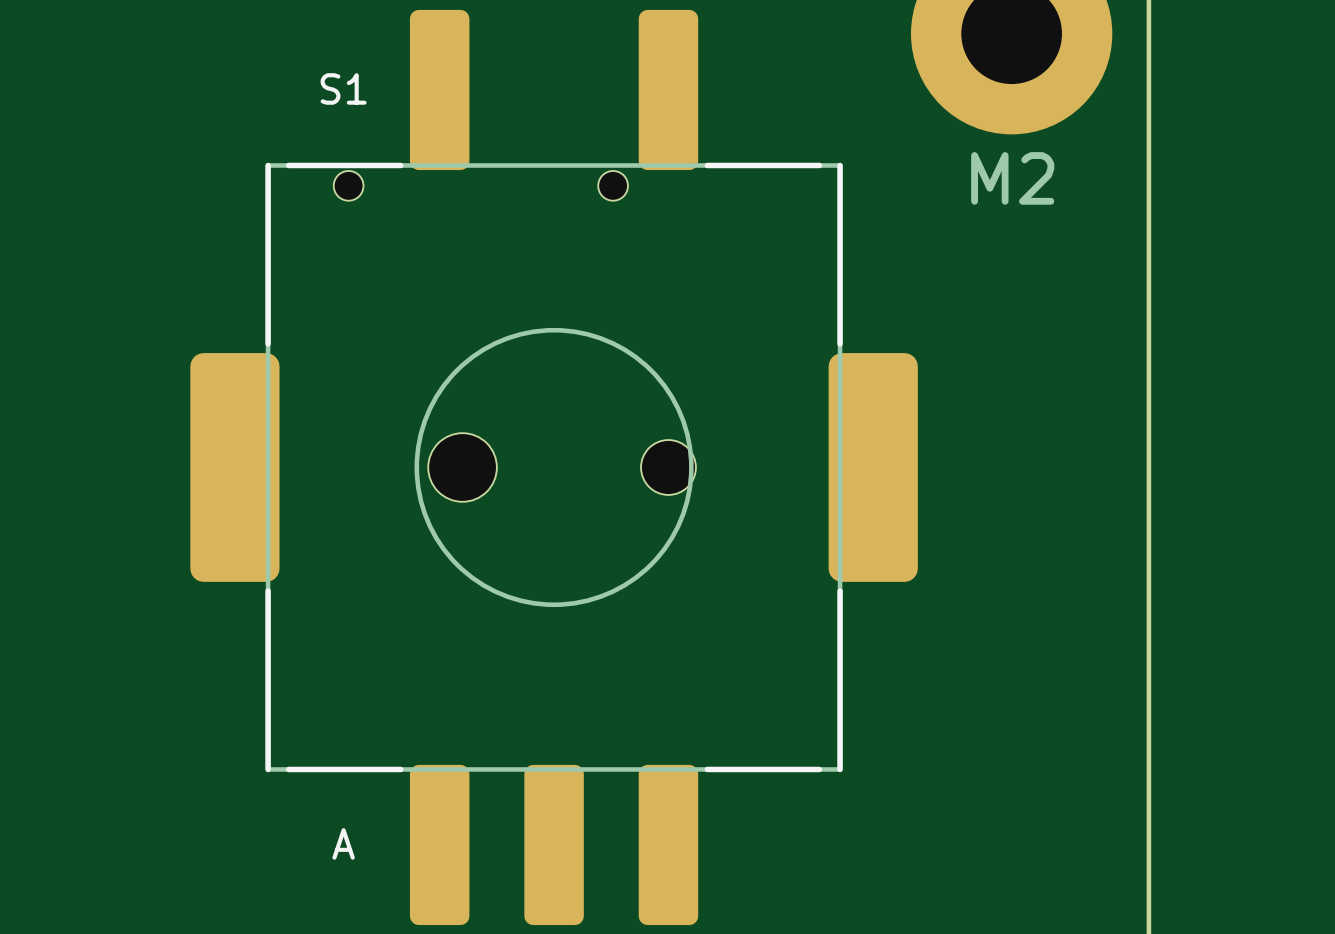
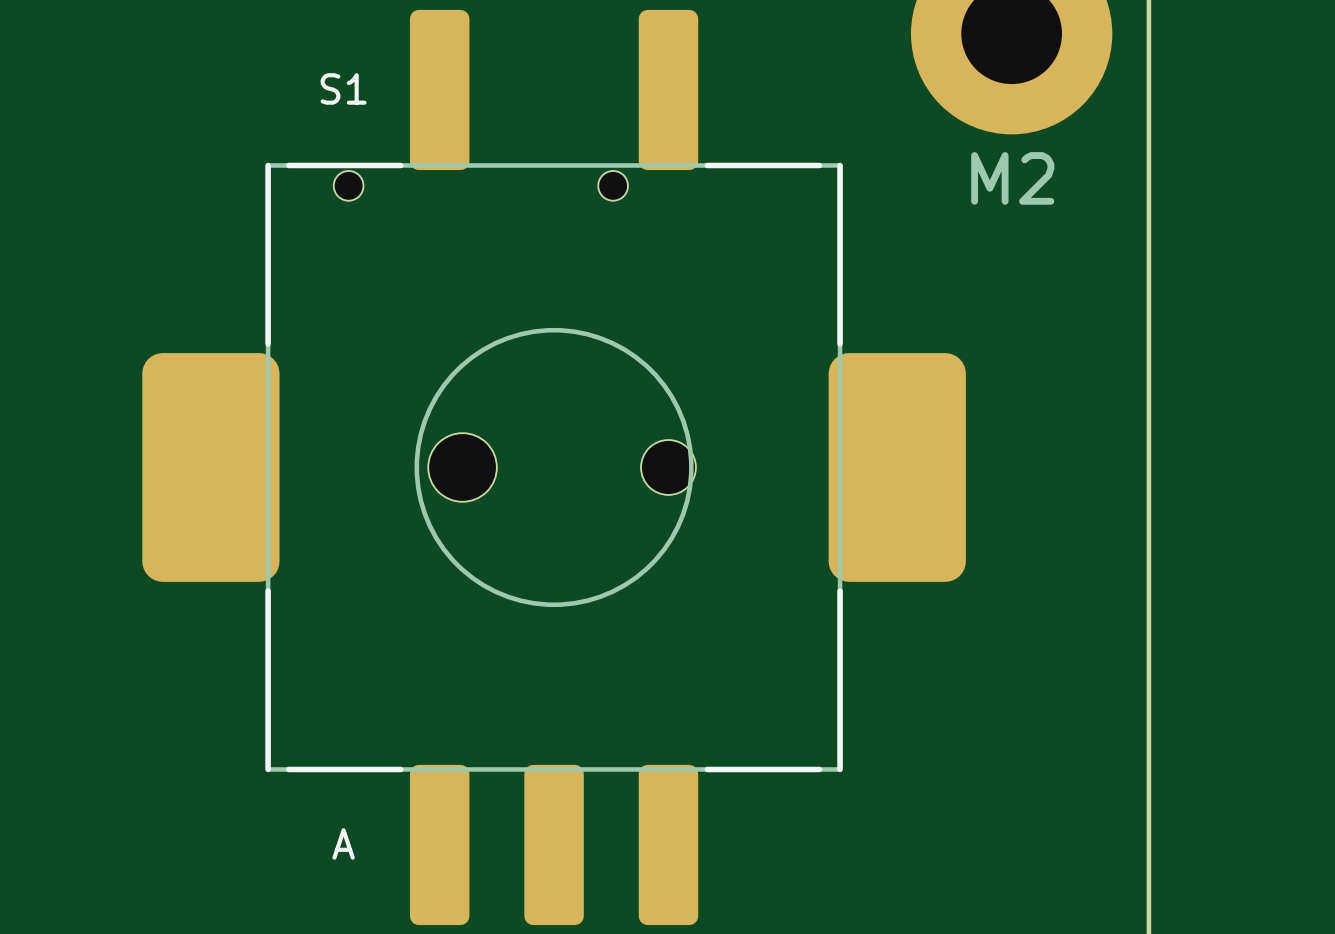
part footprint: [190, 9, 918, 926] -> [142, 9, 966, 926]

